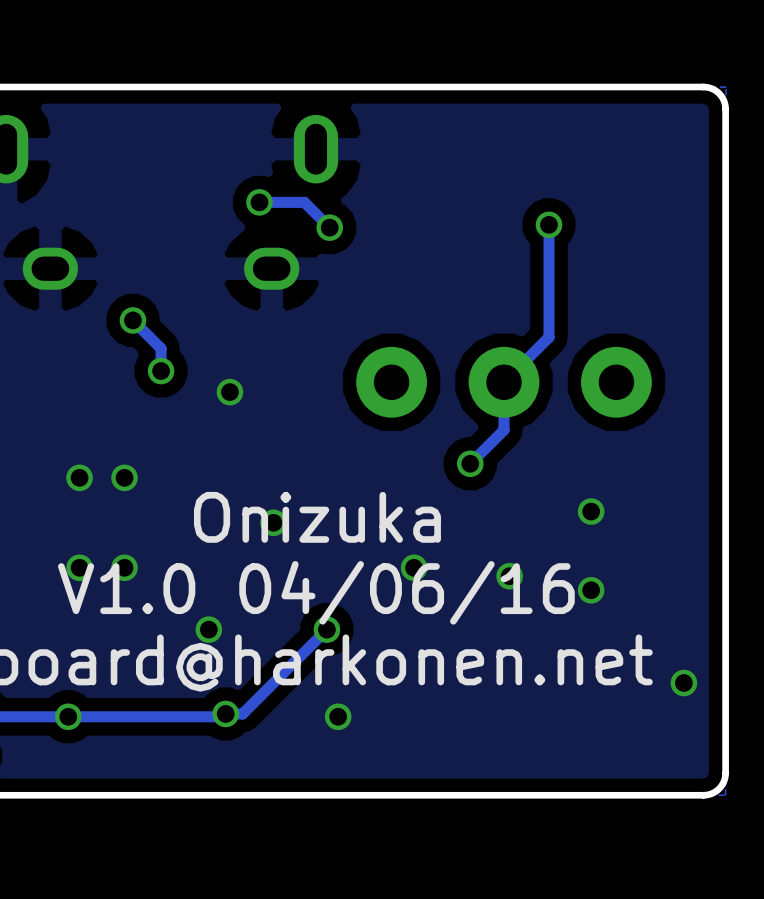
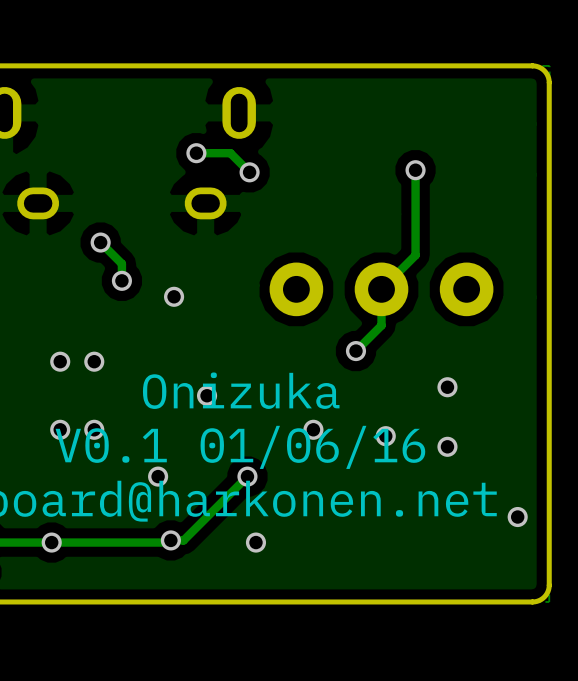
text: V1.0 04/06/16 (316, 592) -> V0.1 01/06/16 (240, 447)

